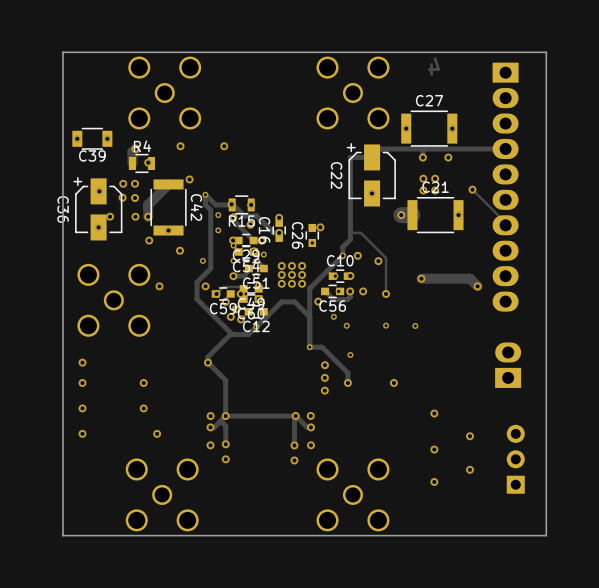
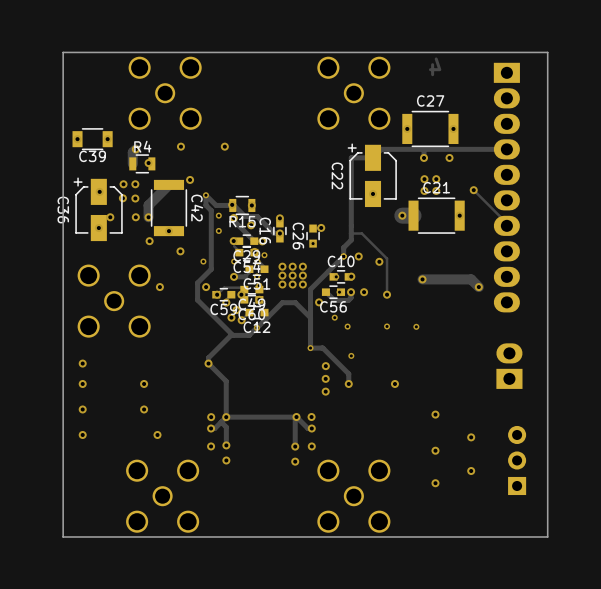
via: (233, 245) -> none

